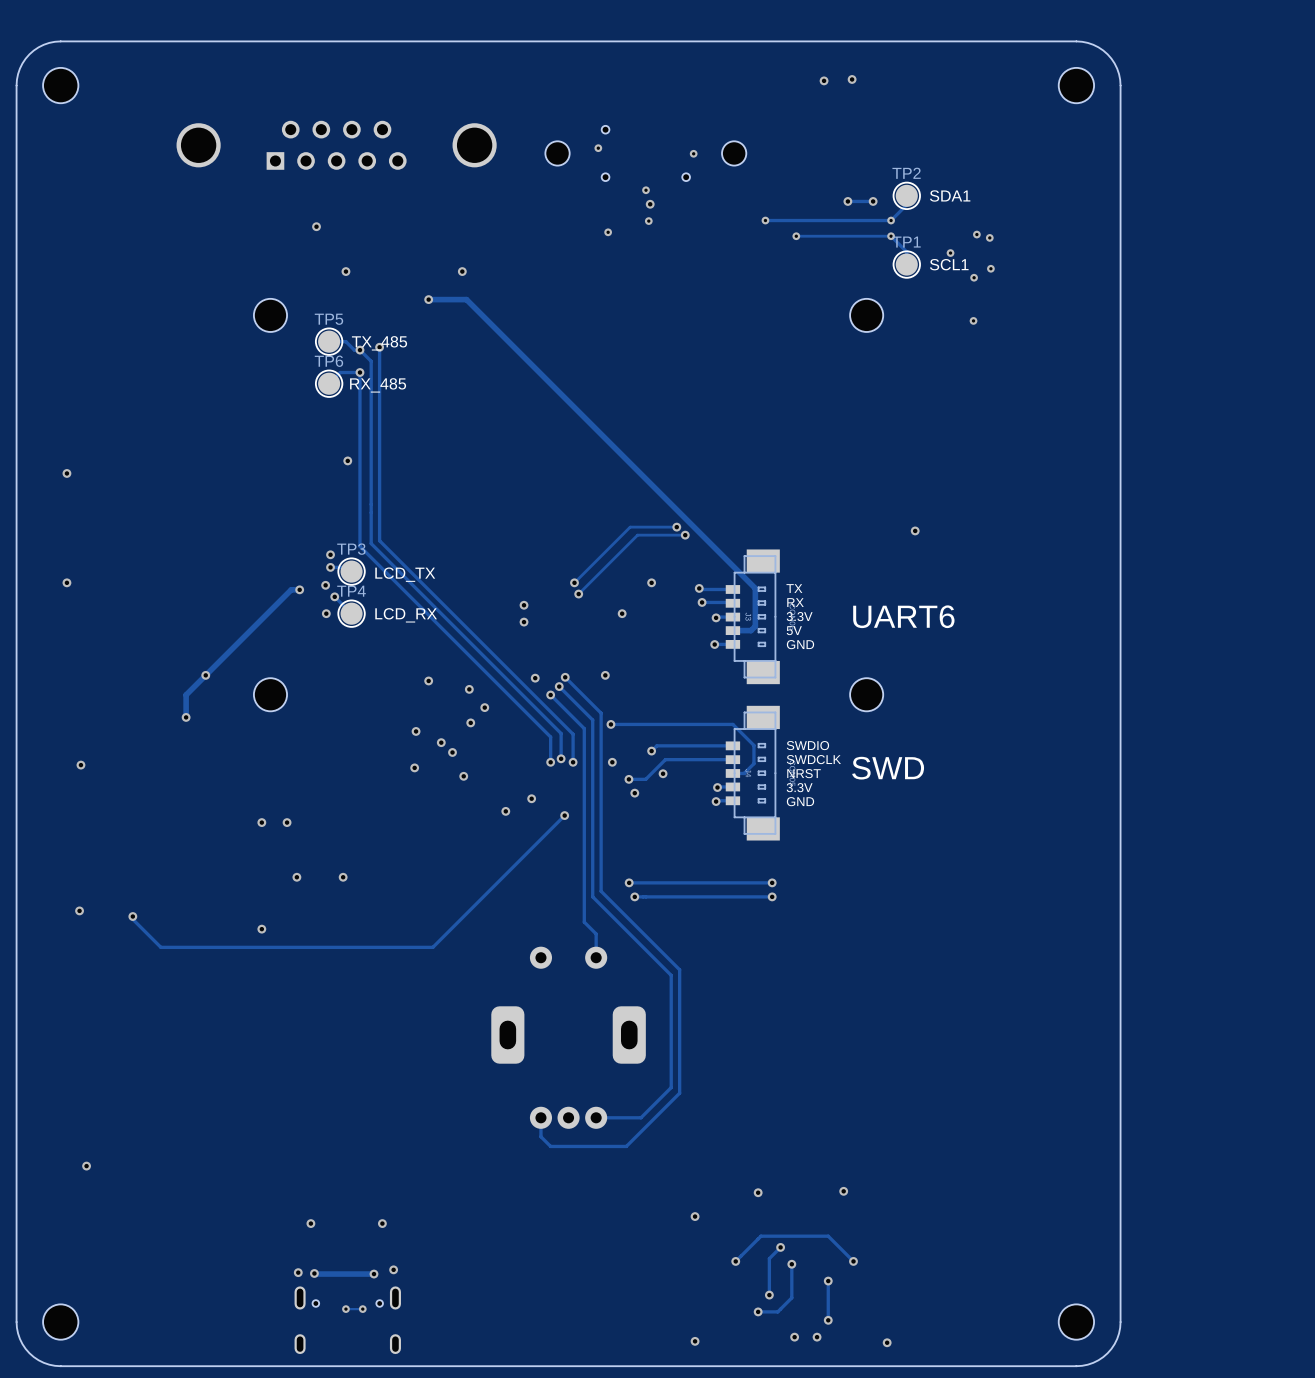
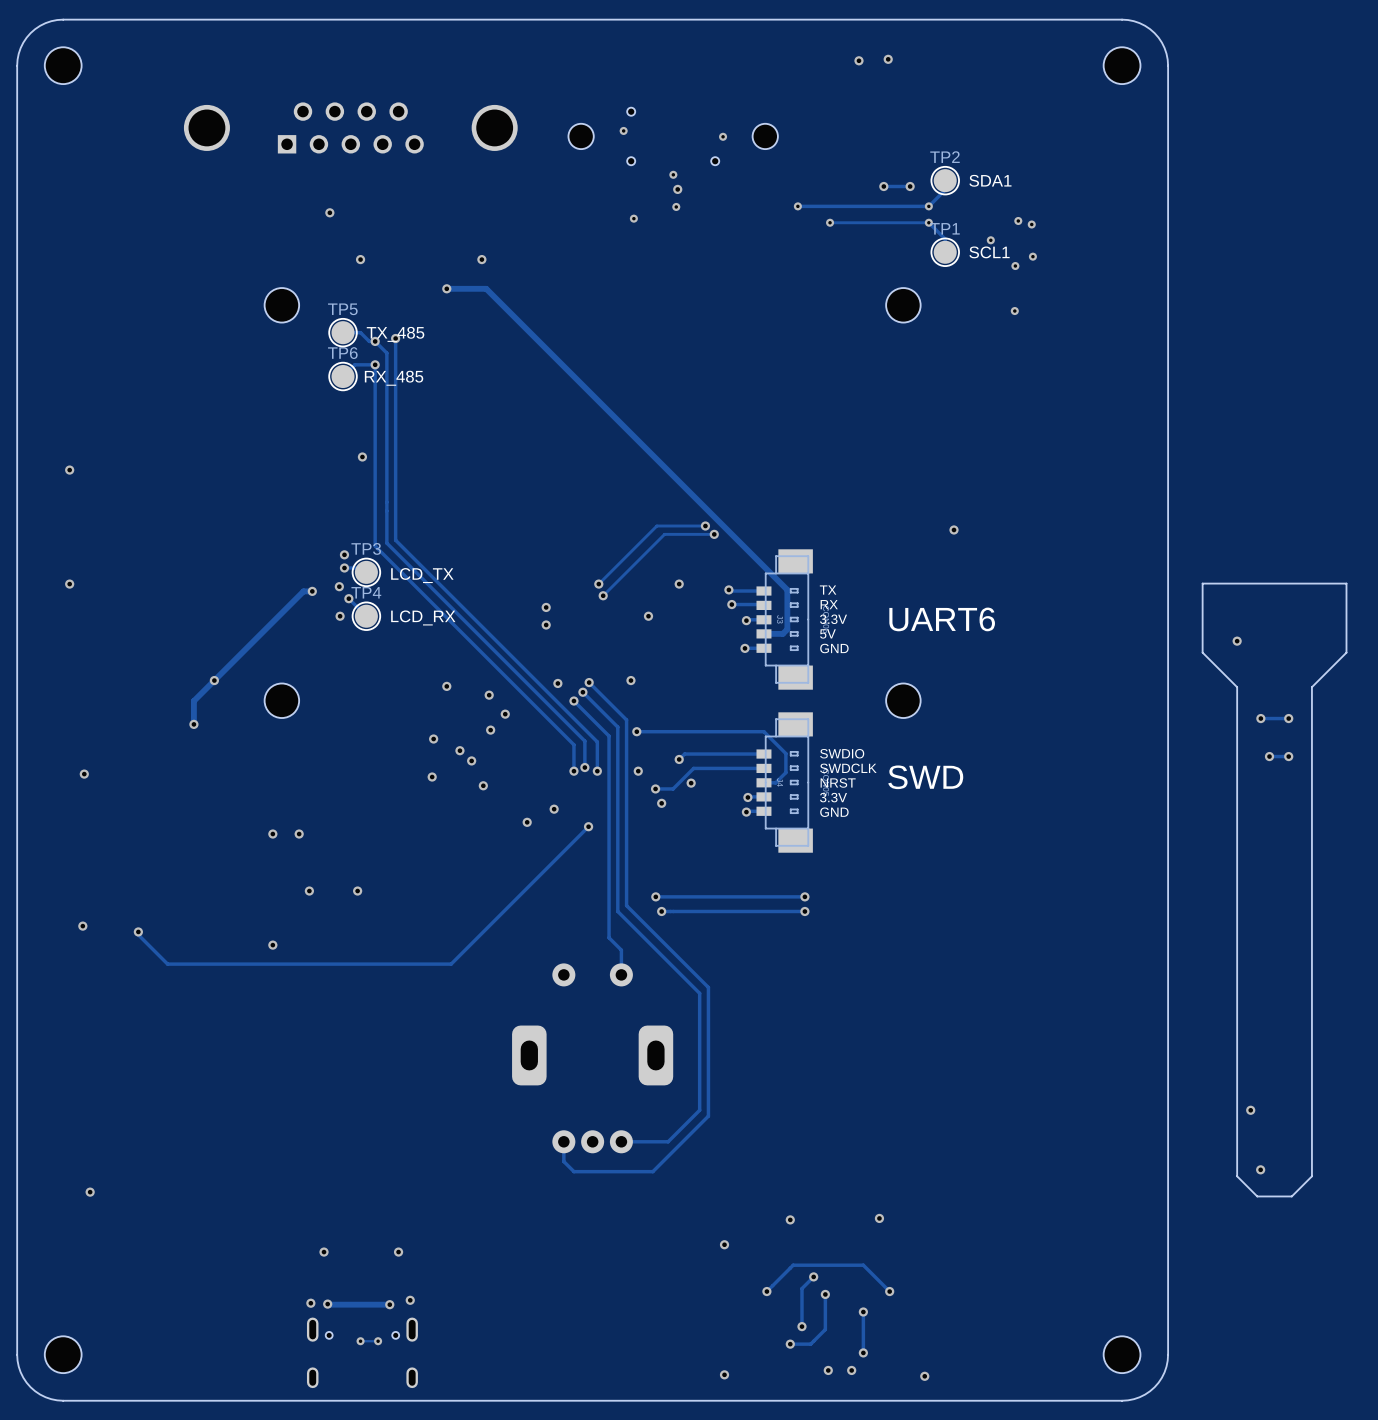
board edge: none -> (1346, 583) (1346, 652) (1311, 687) (1311, 1176) (1291, 1196) (1257, 1196) (1237, 1176) (1237, 687) (1202, 652) (1202, 583) (1346, 583)
via: none -> (1237, 641)
via: none -> (1260, 718)
track: none -> (1288, 718) (1260, 718)
via: none -> (1288, 718)
via: none -> (1269, 756)
track: none -> (1288, 756) (1269, 756)
via: none -> (1288, 756)
via: none -> (1250, 1110)
via: none -> (1260, 1169)

